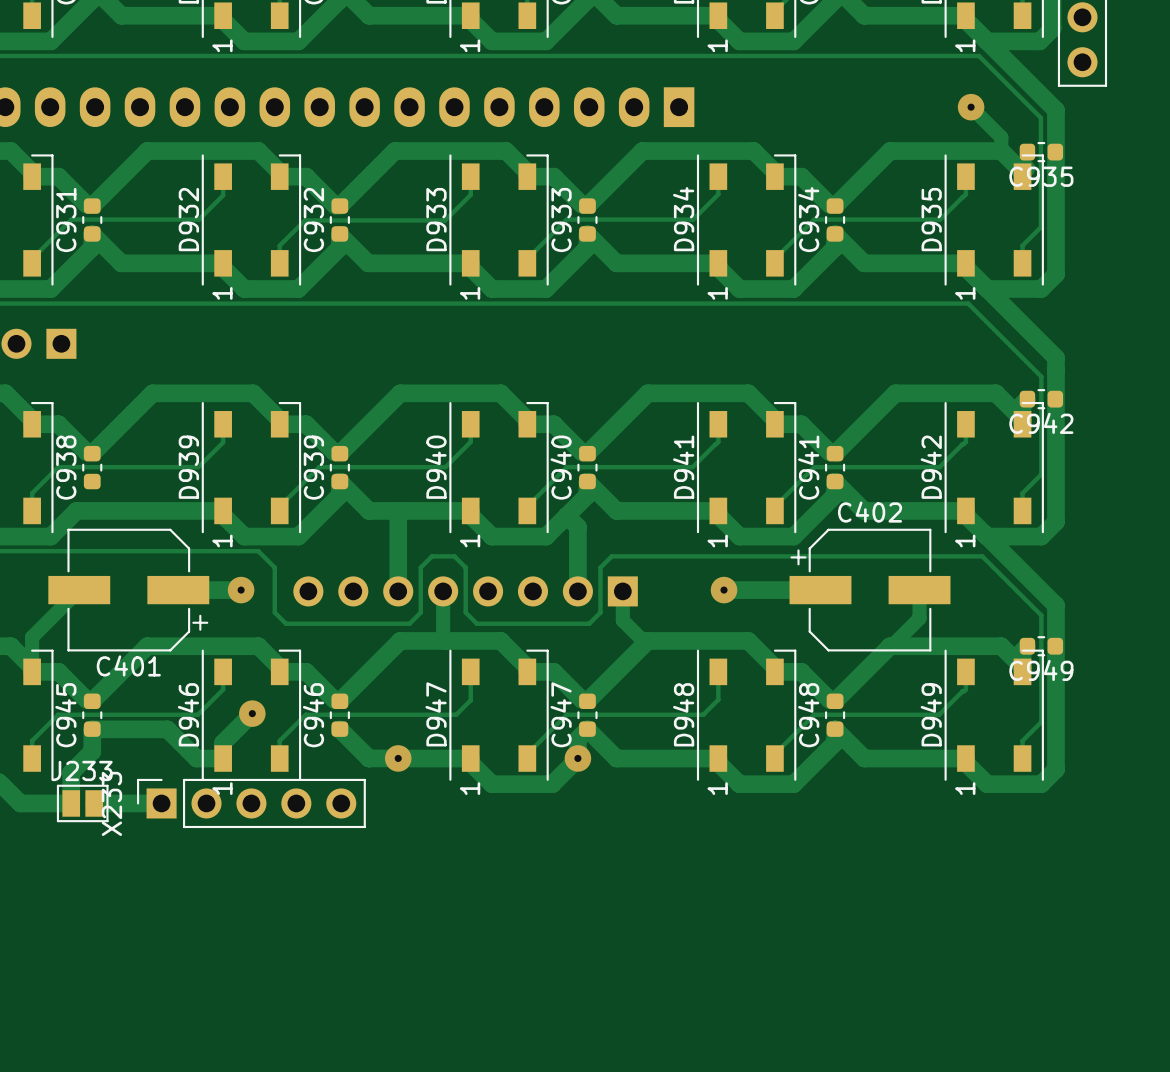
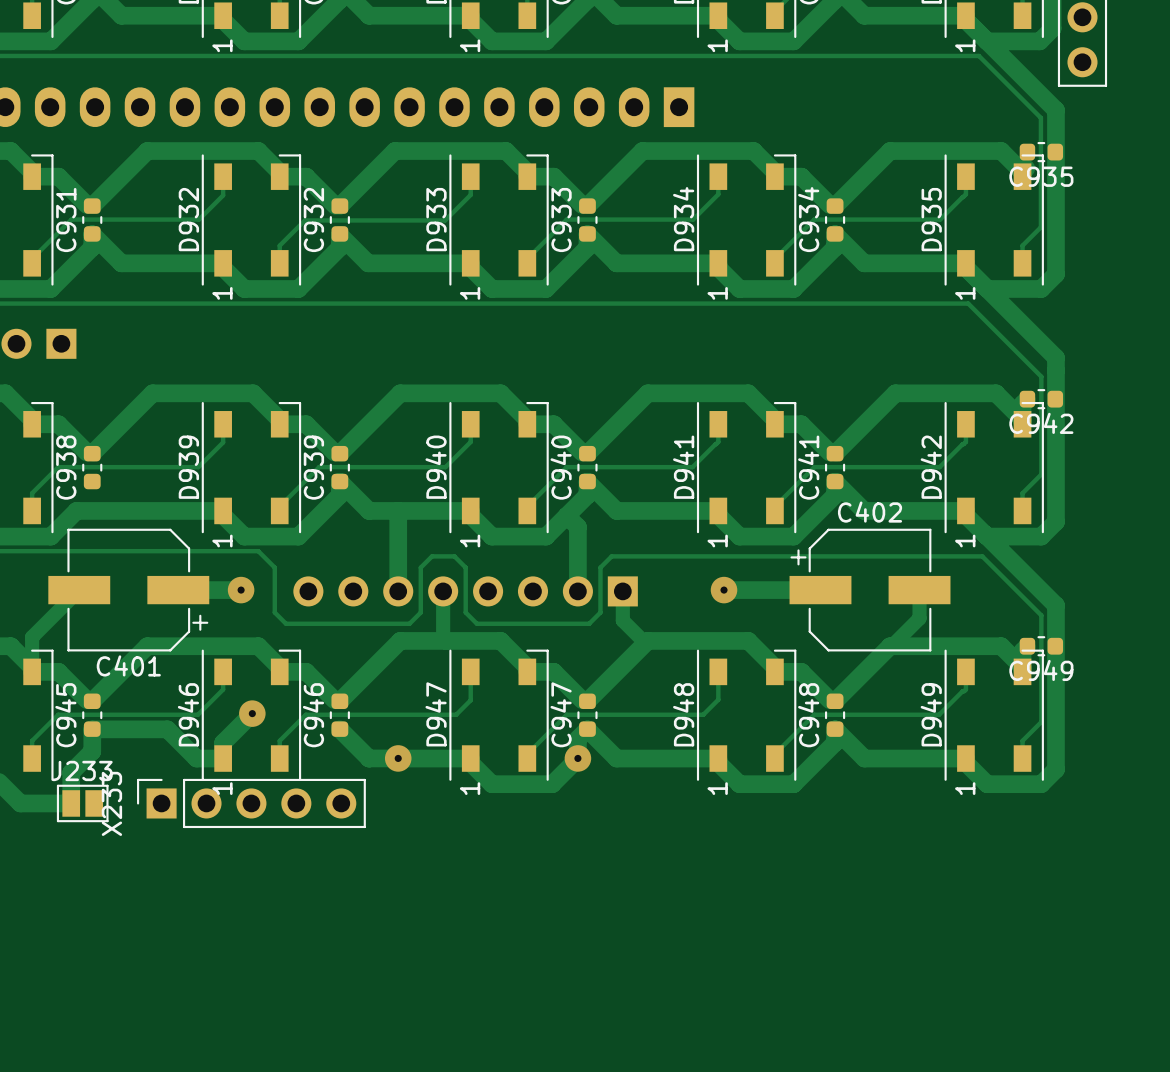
track: (971, 107) (1001, 137) (1001, 151) -> none
via: (971, 107) -> none
track: (94, 803) (161, 803) -> none

